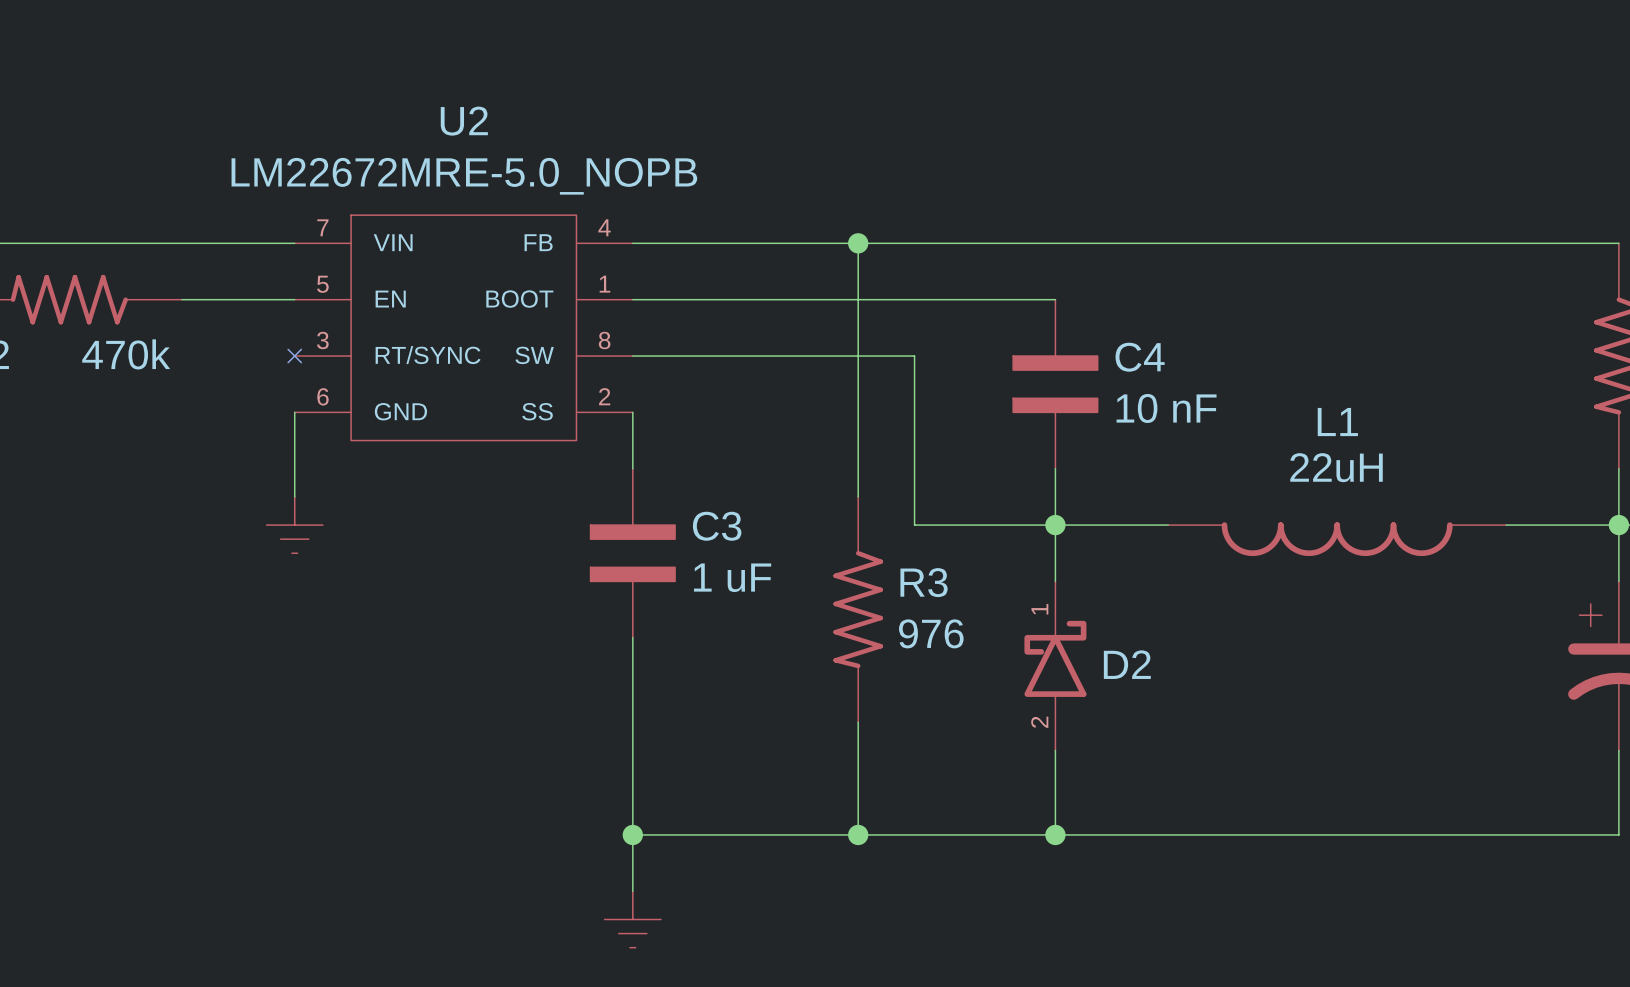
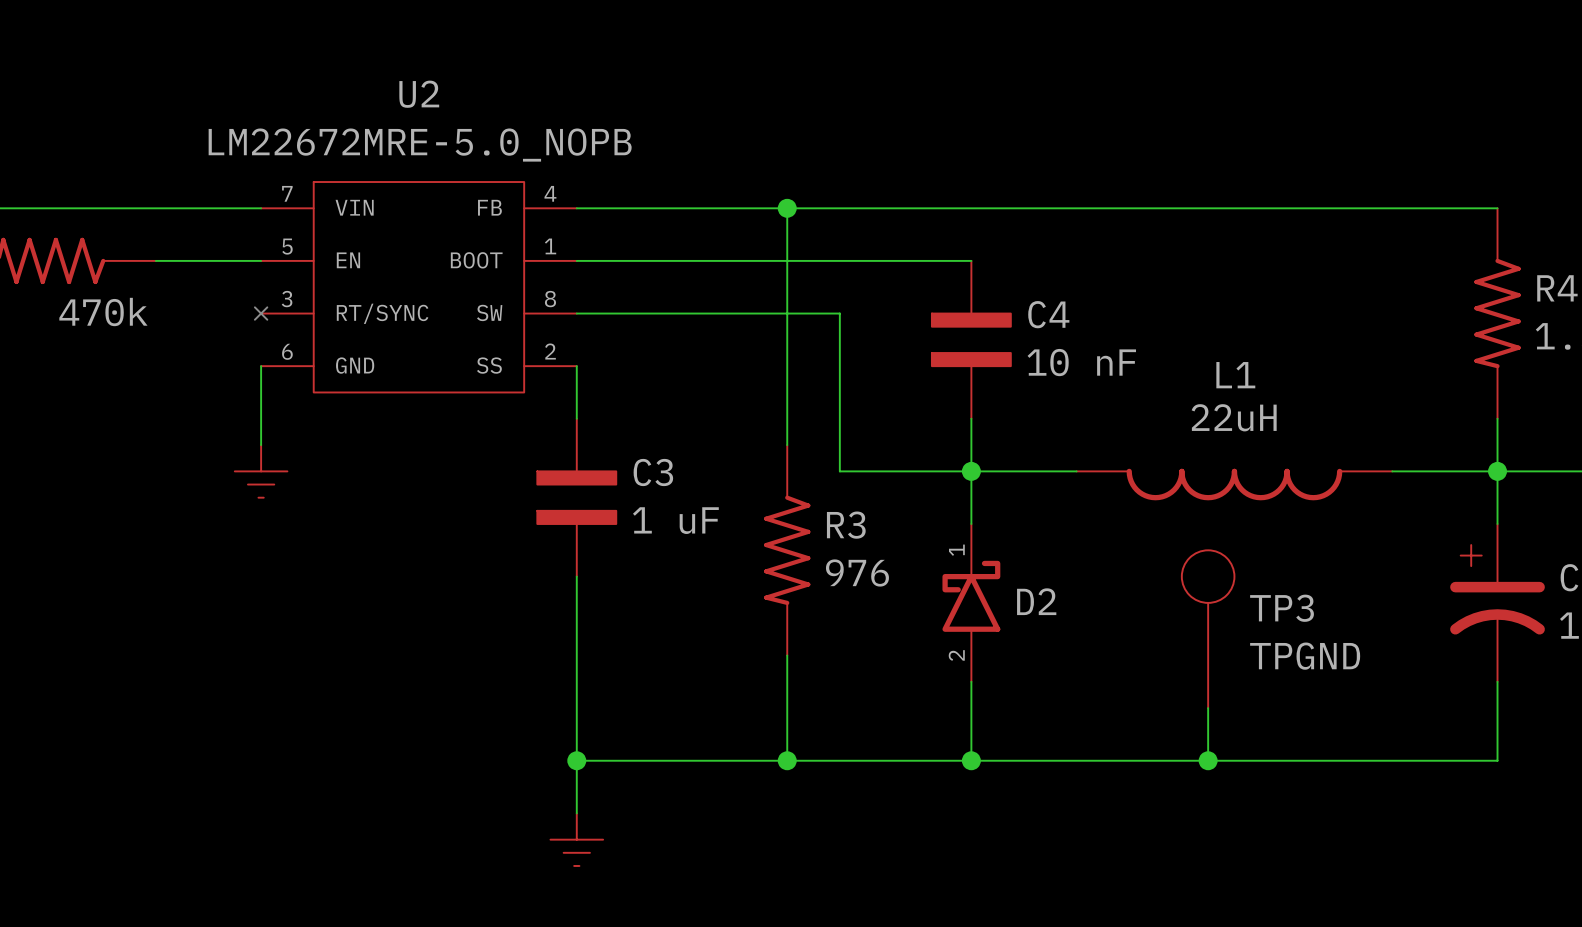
TP3: none -> TPGND (1208, 629)
wire: none -> (1208, 708) (1208, 760)
junction: none -> (1208, 760)

